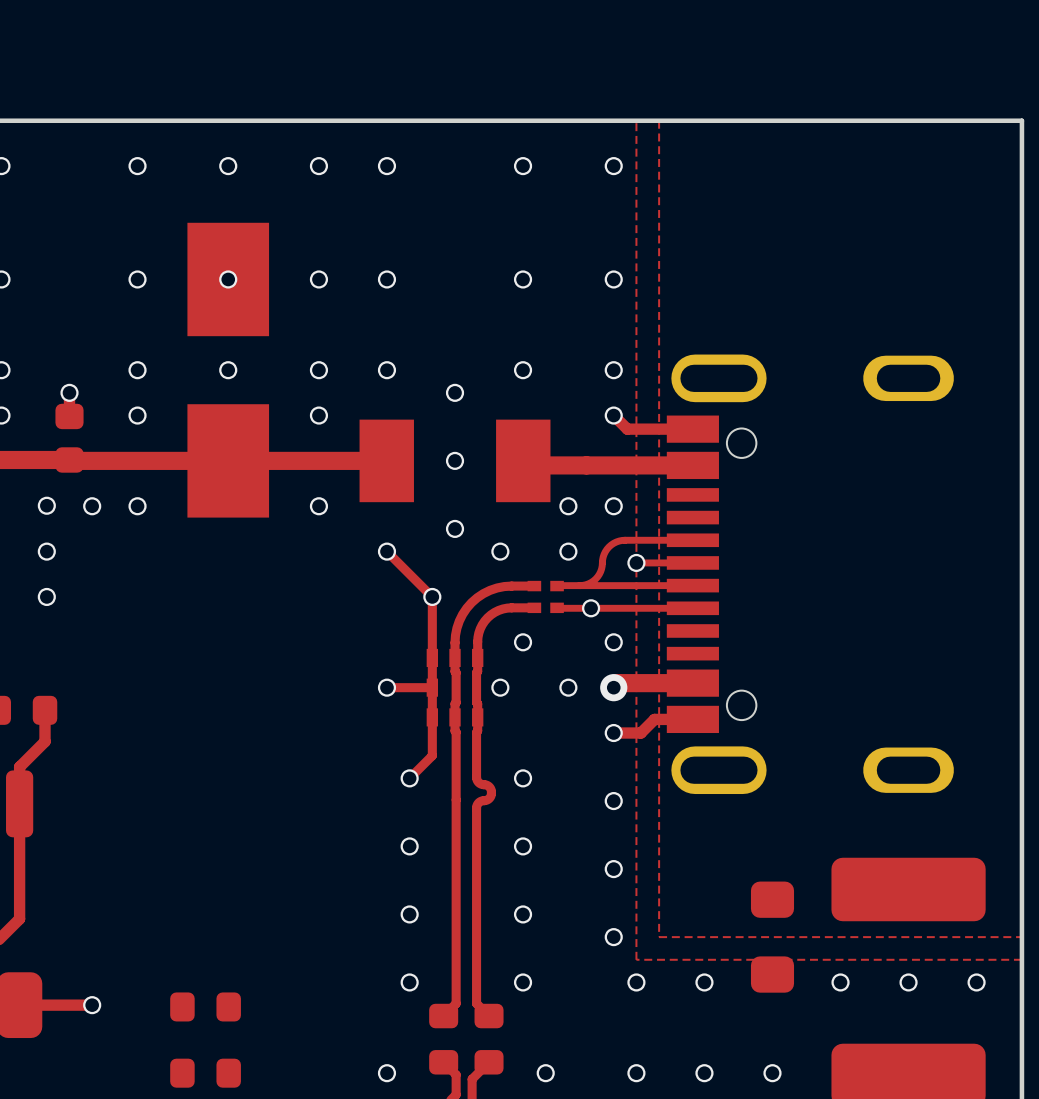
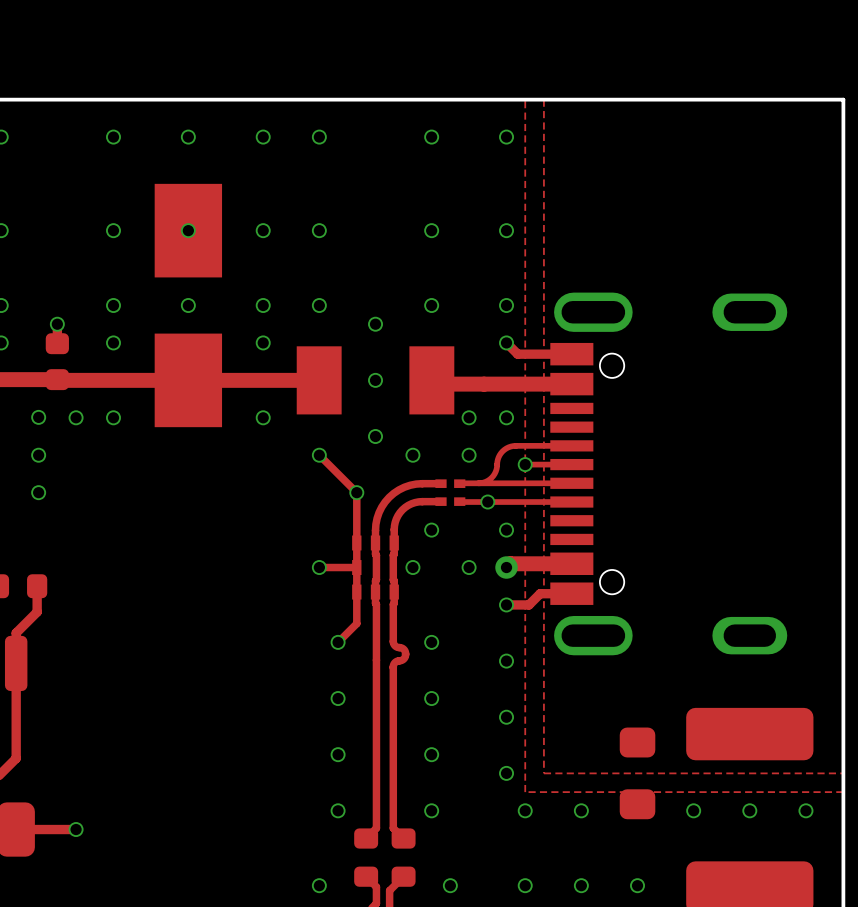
part: (205, 1006) -> none
part: (205, 1073) -> none

